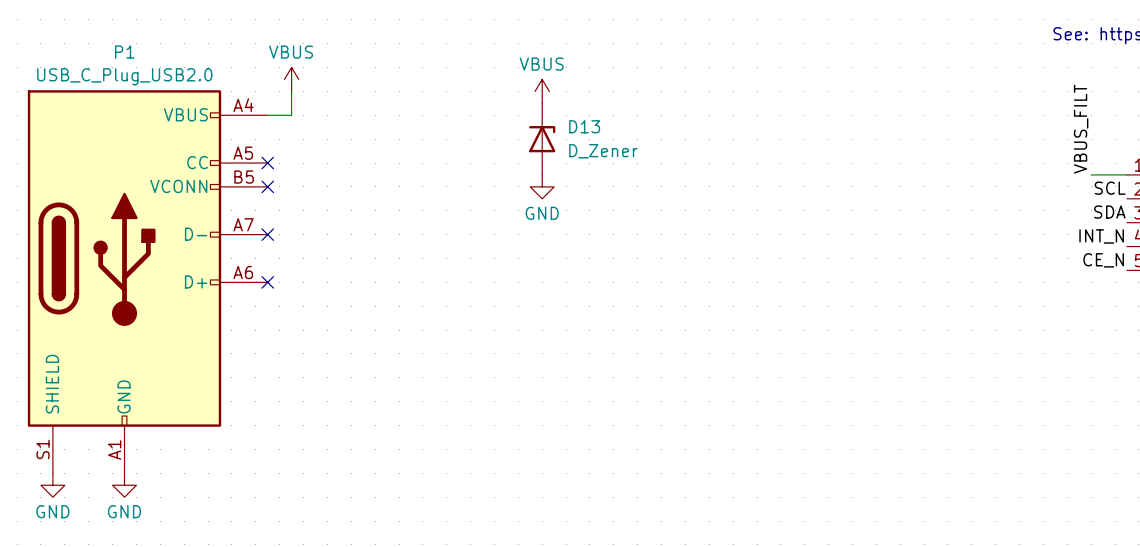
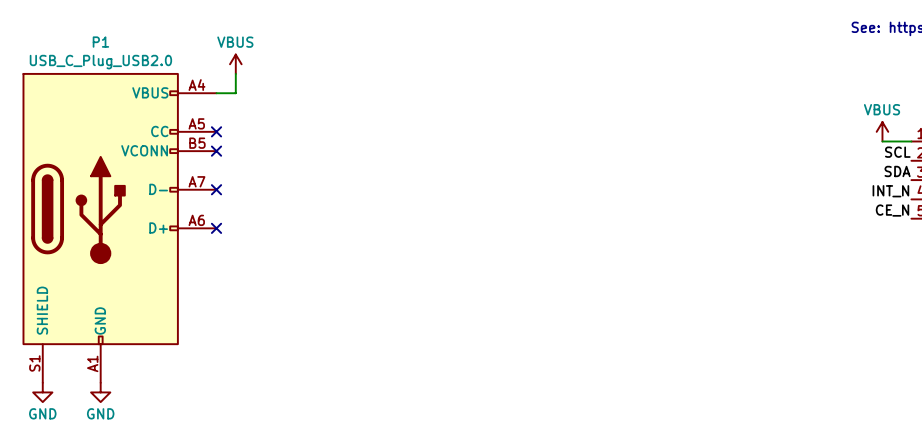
power symbol: VBUS (542, 91) -> none
label: VBUS_FILT (1081, 129) -> none
D13: D_Zener (542, 139) -> none
power symbol: none -> VBUS (882, 131)
power symbol: GND (542, 186) -> none

